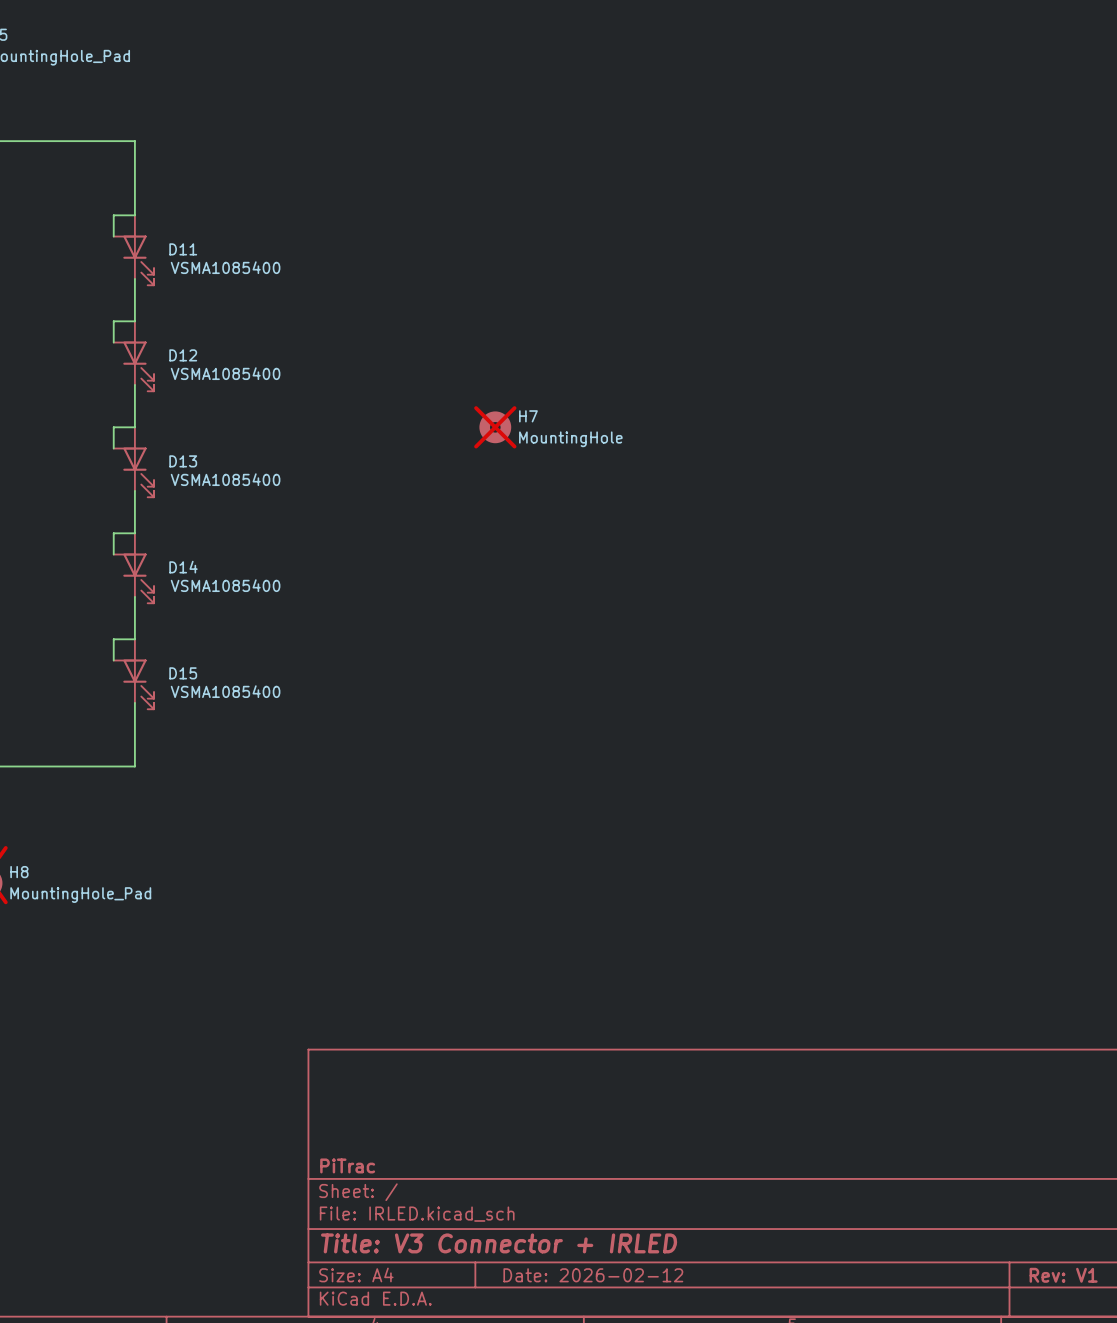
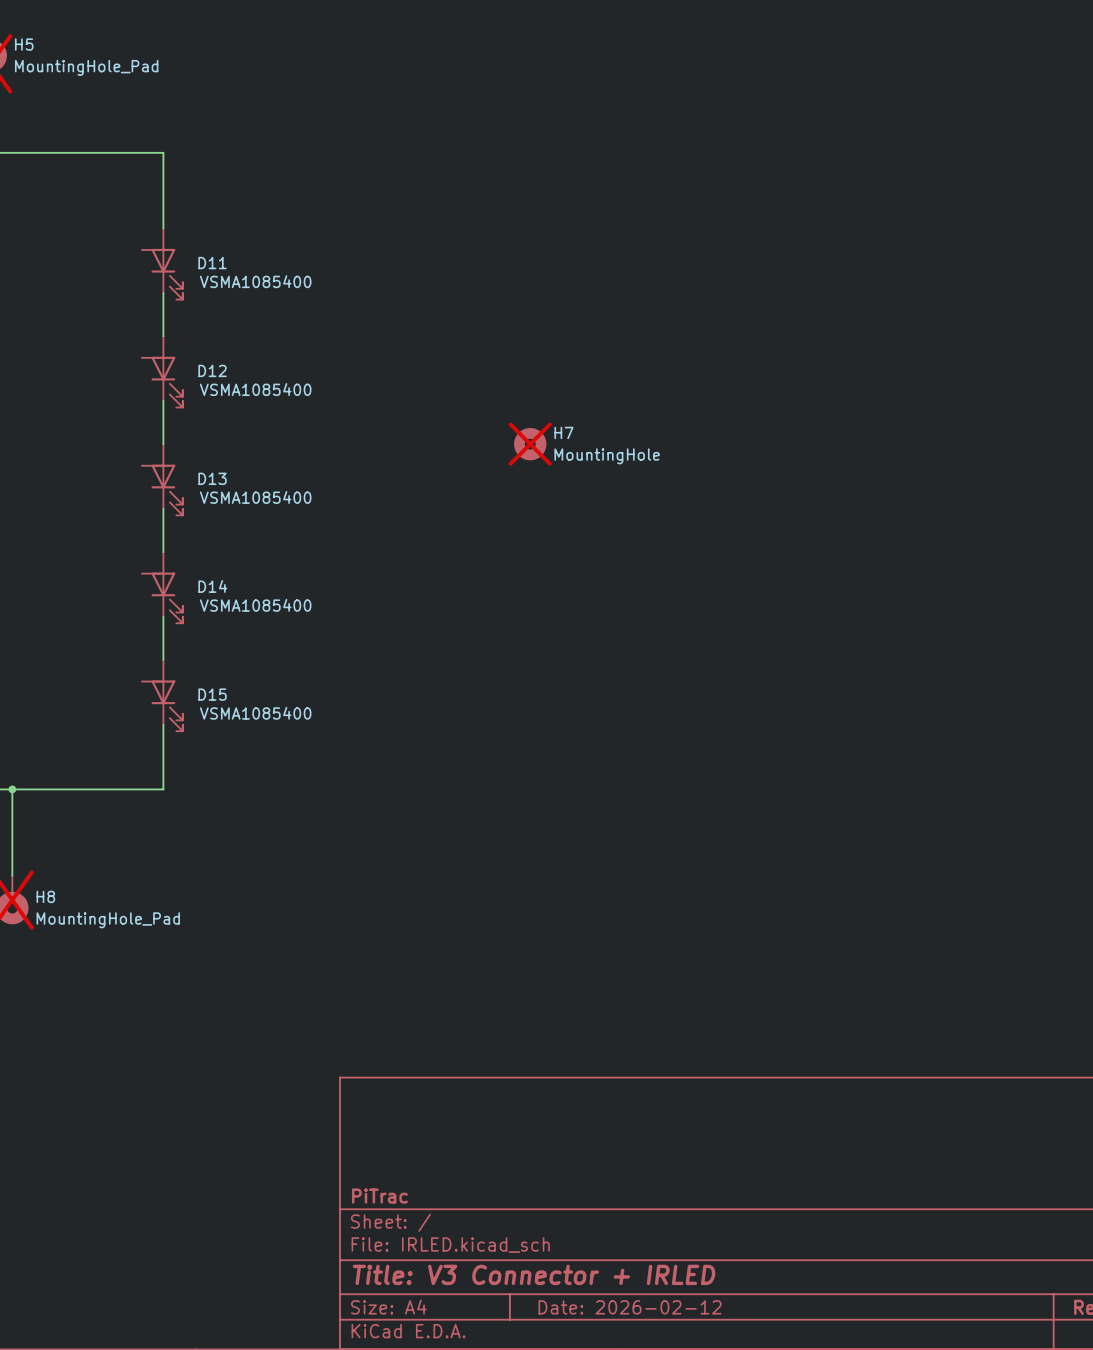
wire: (134, 215) (113, 215) (113, 236) -> none
wire: (134, 321) (113, 321) (113, 342) -> none
wire: (134, 427) (113, 427) (113, 448) -> none
wire: (134, 533) (113, 533) (113, 554) -> none
wire: (134, 639) (113, 639) (113, 660) -> none

